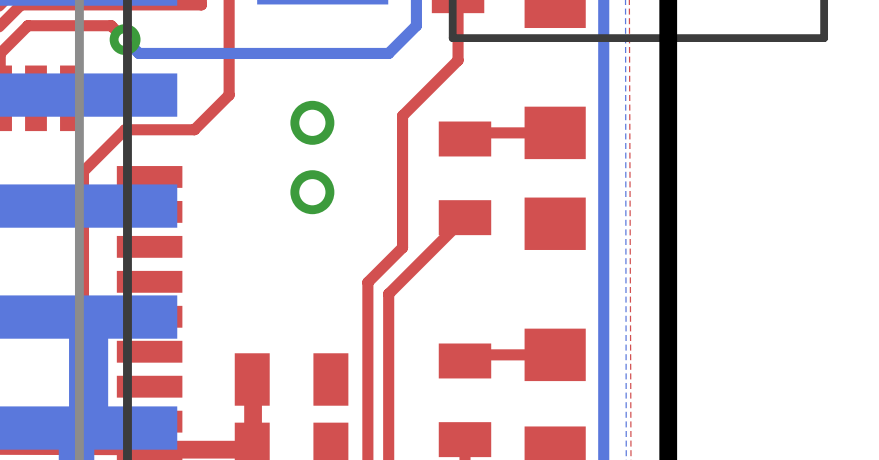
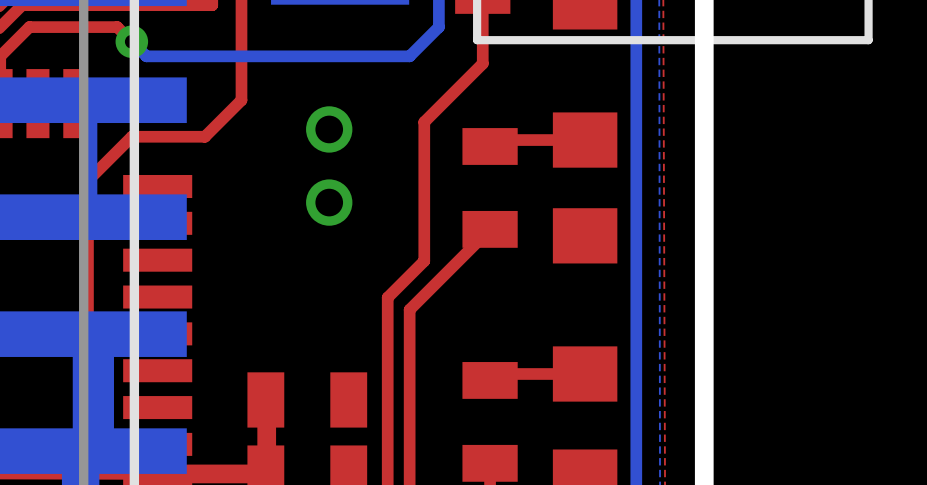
bottom track: none -> (91, 100) (91, 217)

